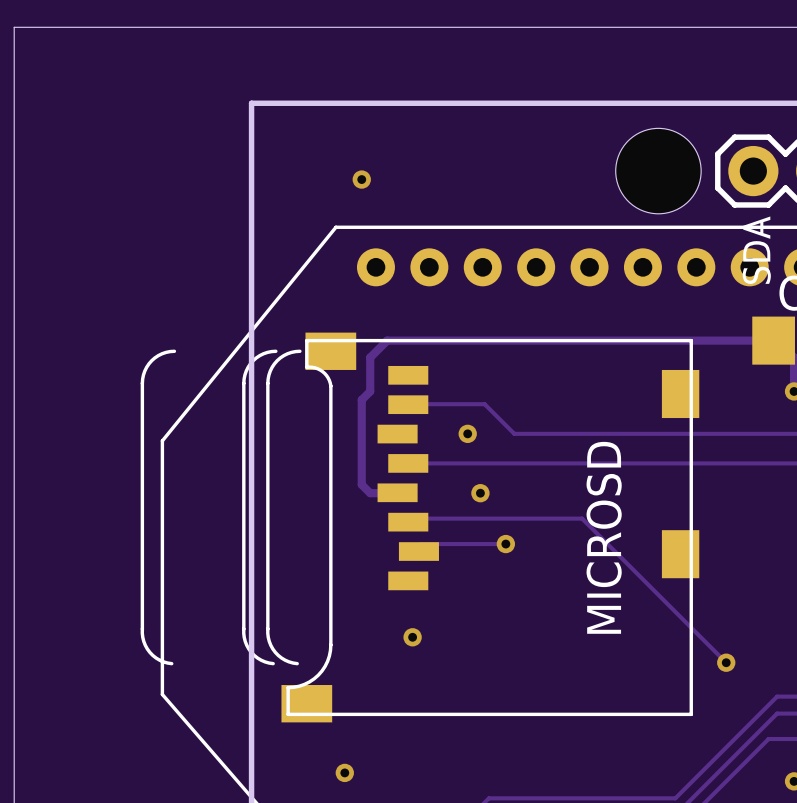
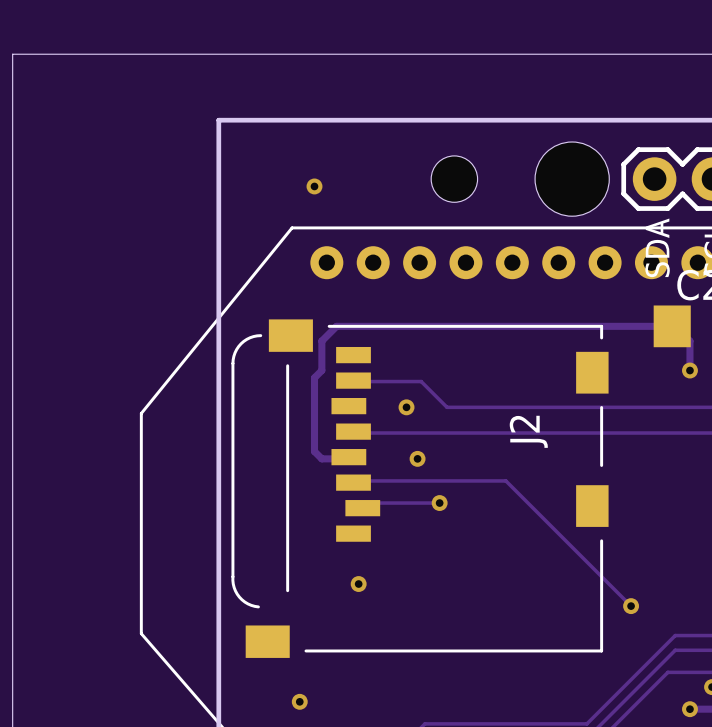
hole: none -> (454, 179)
MICROSD: (419, 527) -> none
J2: none -> (419, 488)

